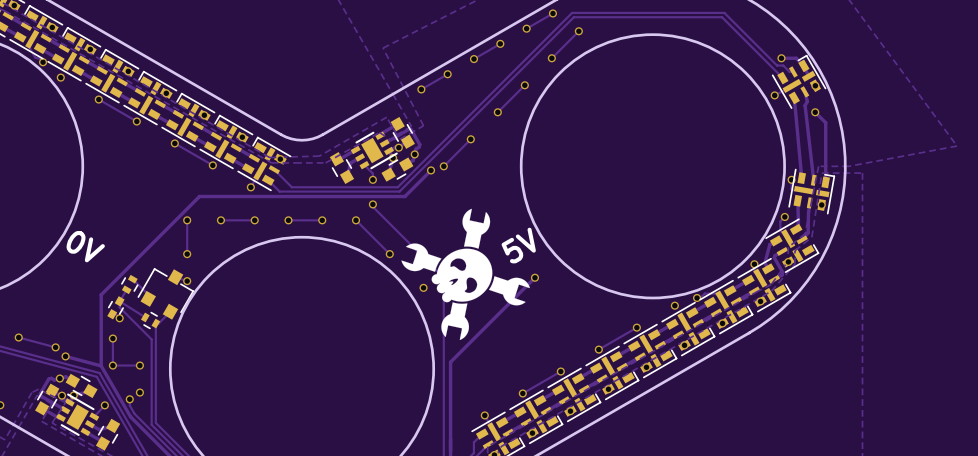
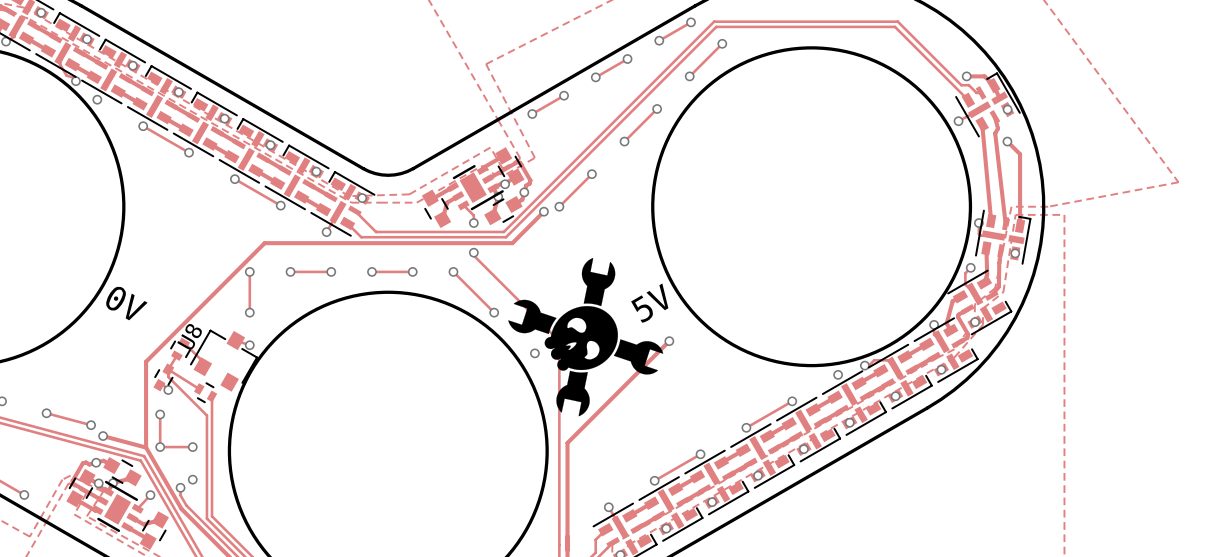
U8 name: none -> U8 (189, 336)
track: (170, 311) (158, 323) (155, 323) -> none

